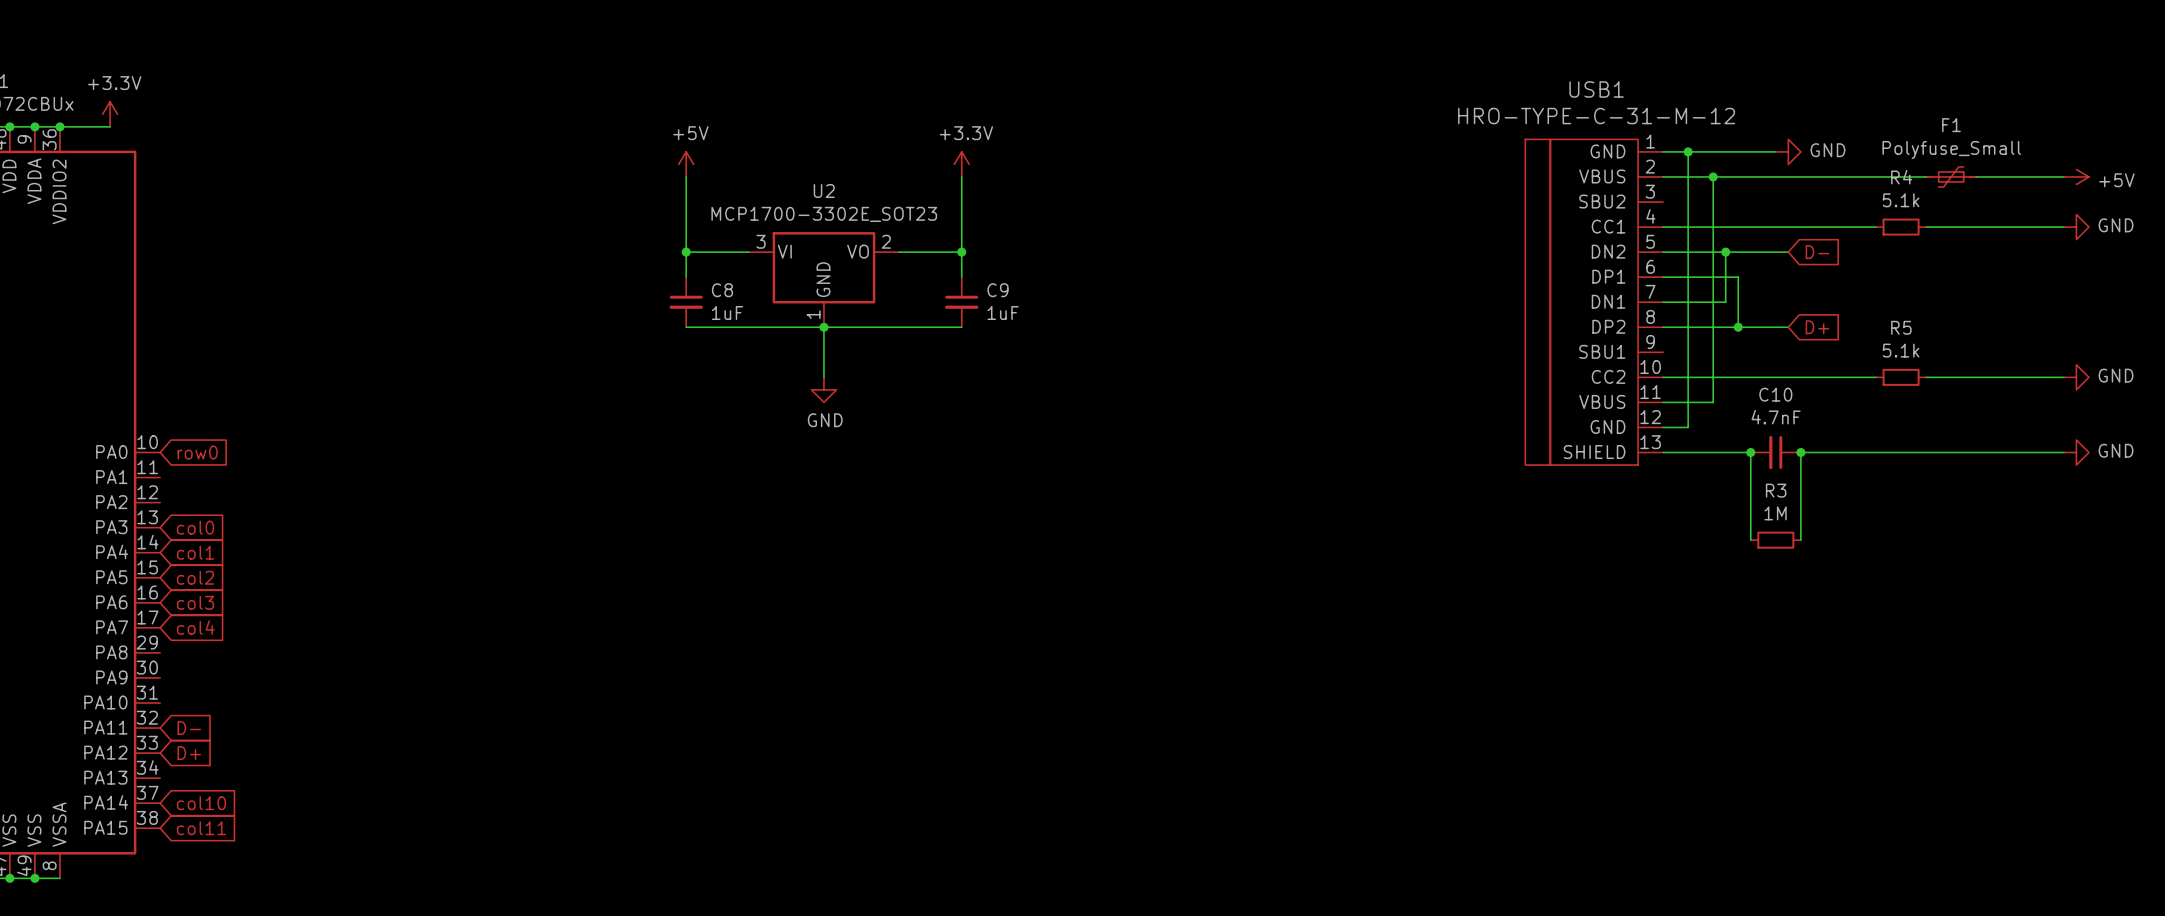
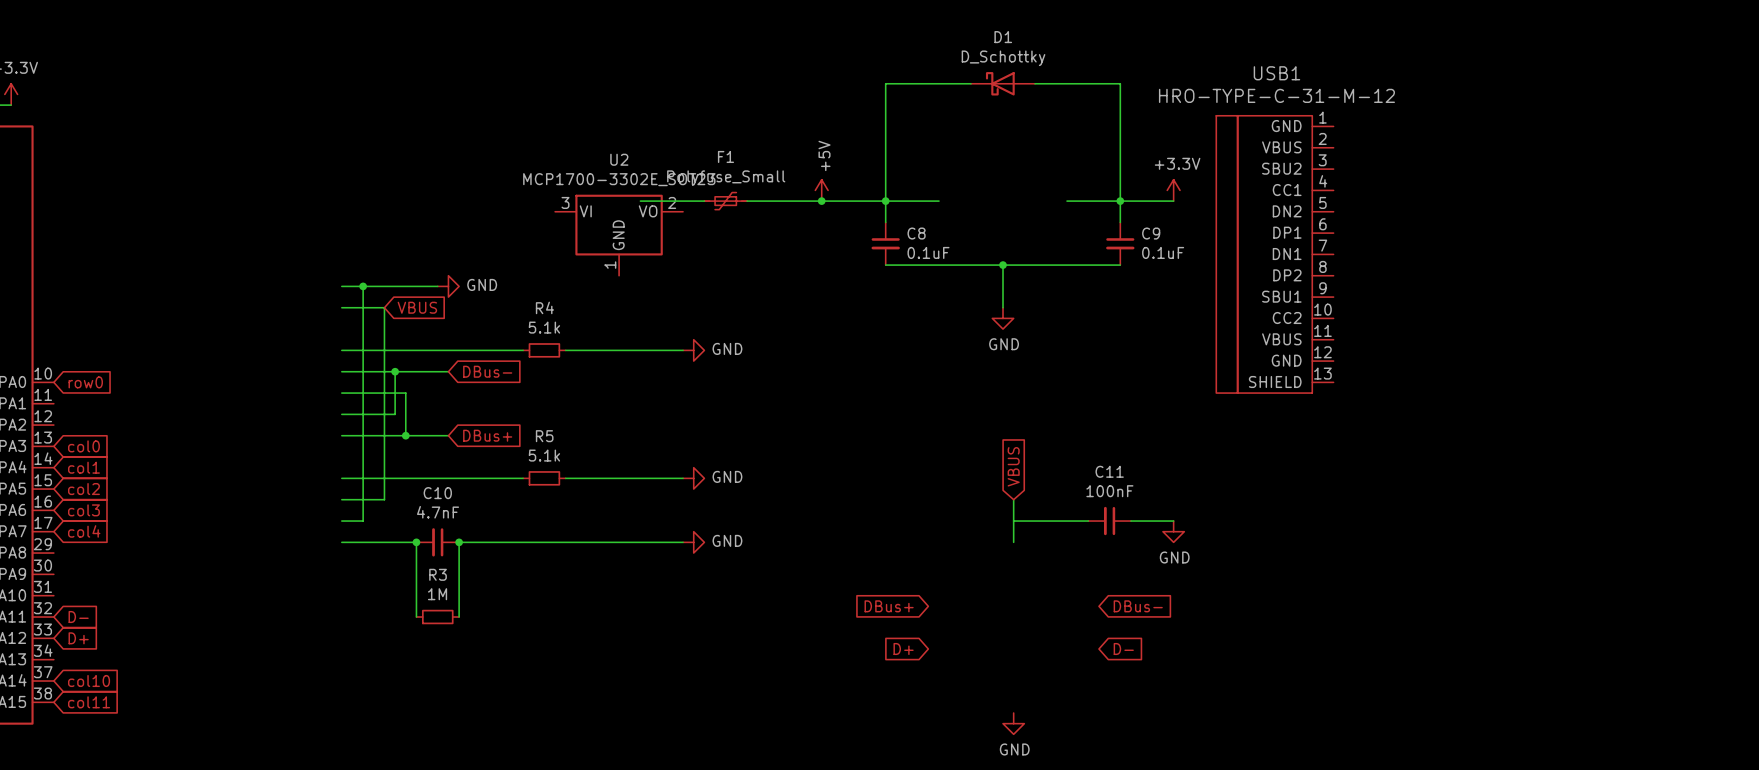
wire: none -> (971, 83) (885, 83) (885, 222)
D1: none -> D_Schottky (1003, 83)
wire: none -> (1034, 83) (1120, 83) (1120, 222)
wire: (1663, 151) (1775, 151) -> none
wire: (1688, 151) (1688, 427) (1663, 427) -> none
junction: (1688, 151) -> none
power symbol: GND (1788, 151) -> none
power symbol: +5V (686, 164) -> none
power symbol: +3.3V (961, 164) -> none
wire: (686, 176) (686, 277) -> none
wire: (961, 176) (961, 277) -> none
wire: (1663, 176) (1926, 176) -> none
wire: (1713, 176) (1713, 402) (1663, 402) -> none
junction: (1713, 176) -> none
F1 position: (1951, 176) -> (725, 201)
wire: (1976, 176) (2063, 176) -> none
power symbol: +5V (2076, 176) -> none
power symbol: none -> +5V (821, 190)
power symbol: none -> +3.3V (1173, 190)
wire: (1663, 227) (1876, 227) -> none
R4 position: (1901, 227) -> (544, 350)
wire: (1926, 227) (2063, 227) -> none
power symbol: GND (2076, 227) -> none
wire: none -> (640, 201) (704, 201)
wire: none -> (747, 201) (939, 201)
junction: none -> (821, 201)
junction: none -> (885, 201)
wire: none -> (1066, 201) (1173, 201)
junction: none -> (1120, 201)
wire: (686, 252) (748, 252) -> none
junction: (686, 252) -> none
wire: (899, 252) (961, 252) -> none
junction: (961, 252) -> none
wire: (1663, 252) (1788, 252) -> none
wire: (1725, 252) (1725, 302) (1663, 302) -> none
junction: (1725, 252) -> none
global label: D- (1817, 252) -> none
wire: (1663, 277) (1738, 277) (1738, 327) -> none
C8 position: (686, 302) -> (885, 243)
C9 position: (961, 302) -> (1120, 243)
C8 value: 1uF (727, 313) -> 0.1uF (928, 252)
C9 value: 1uF (1003, 313) -> 0.1uF (1163, 252)
wire: none -> (885, 265) (1120, 265)
wire: none -> (1003, 265) (1003, 307)
junction: none -> (1003, 265)
wire: (686, 327) (961, 327) -> none
wire: (823, 327) (823, 377) -> none
junction: (823, 327) -> none
wire: (1663, 327) (1788, 327) -> none
junction: (1738, 327) -> none
global label: D+ (1817, 327) -> none
wire: none -> (341, 286) (437, 286)
wire: none -> (363, 286) (363, 521) (341, 521)
junction: none -> (363, 286)
power symbol: none -> GND (448, 286)
wire: none -> (341, 307) (384, 307) (384, 499) (341, 499)
global label: none -> VBUS (417, 307)
power symbol: none -> GND (1003, 318)
wire: (1663, 377) (1876, 377) -> none
R5 position: (1901, 377) -> (544, 478)
wire: (1926, 377) (2063, 377) -> none
power symbol: GND (2076, 377) -> none
power symbol rotation: 0° (823, 389) -> 90° counterclockwise (693, 350)
power symbol position: GND (823, 389) -> GND (693, 350)
wire: none -> (341, 350) (523, 350)
wire: none -> (565, 350) (683, 350)
wire: none -> (341, 371) (448, 371)
wire: none -> (395, 371) (395, 414) (341, 414)
junction: none -> (395, 371)
global label: none -> DBus- (487, 371)
wire: (1663, 452) (1750, 452) (1750, 540) -> none
junction: (1750, 452) -> none
C10 position: (1775, 452) -> (437, 542)
junction: (1800, 452) -> none
wire: (2063, 452) (1800, 452) (1800, 540) -> none
power symbol: GND (2076, 452) -> none
wire: none -> (341, 393) (405, 393) (405, 435)
wire: none -> (341, 435) (448, 435)
junction: none -> (405, 435)
global label: none -> DBus+ (487, 435)
R3 position: (1775, 540) -> (437, 617)
global label: none -> VBUS (1013, 466)
wire: none -> (341, 478) (523, 478)
wire: none -> (565, 478) (683, 478)
power symbol: none -> GND (693, 478)
wire: none -> (1013, 499) (1013, 542)
wire: none -> (1013, 521) (1088, 521)
C11: none -> 100nF (1109, 521)
wire: none -> (1130, 521) (1173, 521)
power symbol: none -> GND (1173, 531)
wire: none -> (341, 542) (416, 542) (416, 617)
junction: none -> (416, 542)
junction: none -> (459, 542)
wire: none -> (683, 542) (459, 542) (459, 617)
power symbol: none -> GND (693, 542)
global label: none -> DBus+ (889, 606)
global label: none -> DBus- (1138, 606)
global label: none -> D+ (903, 649)
global label: none -> D- (1123, 649)
power symbol: none -> GND (1013, 723)

